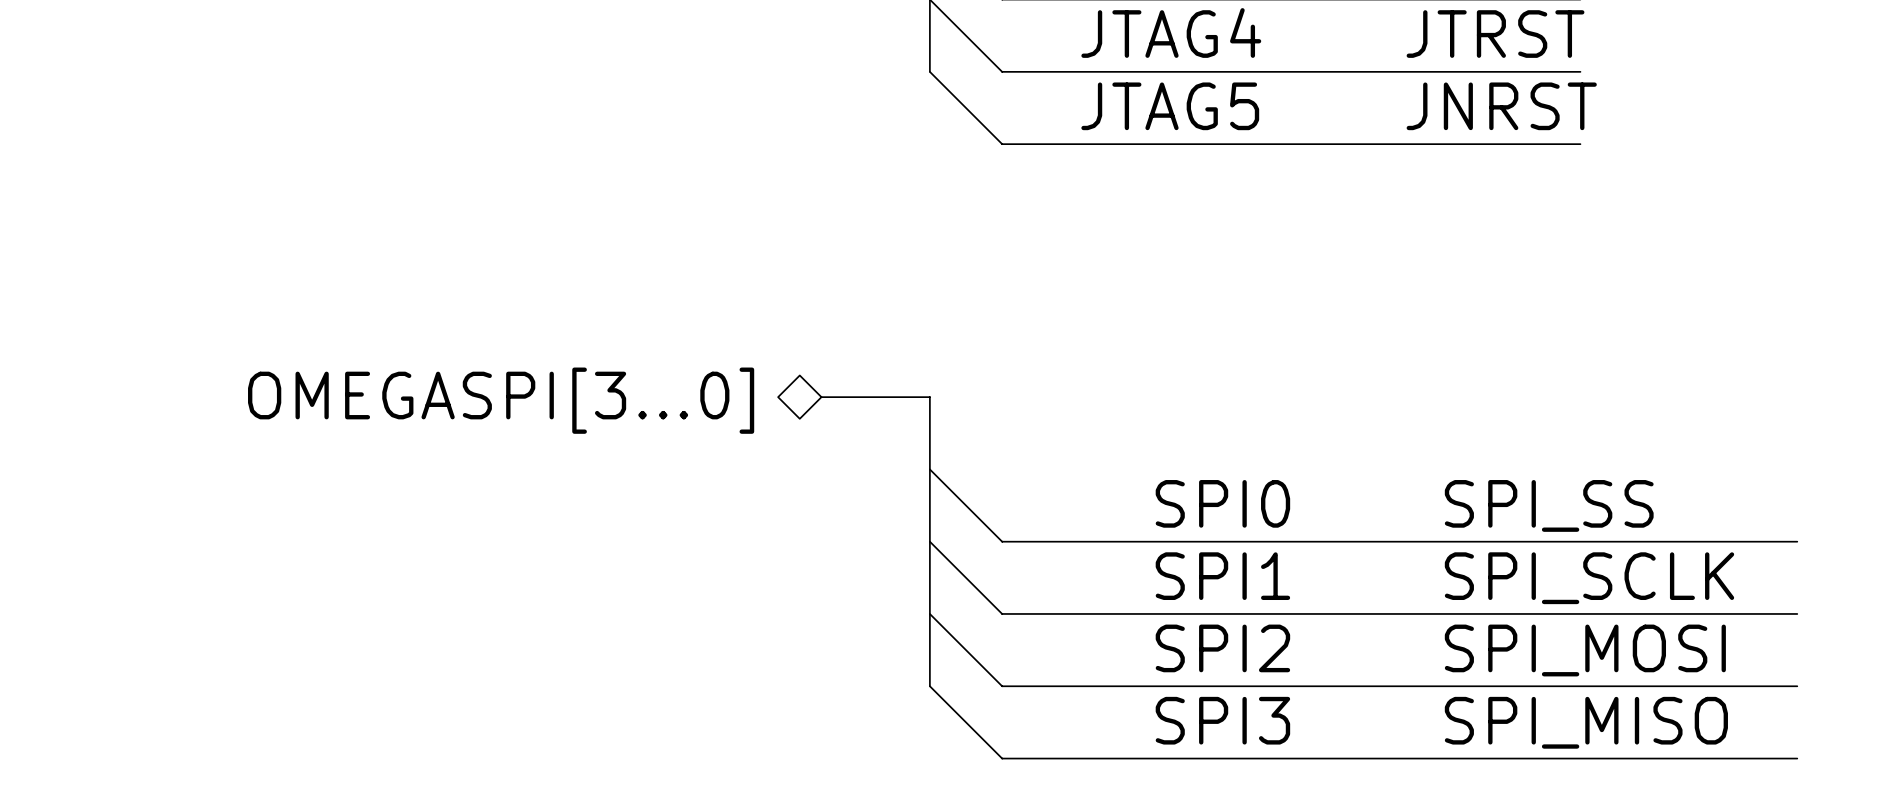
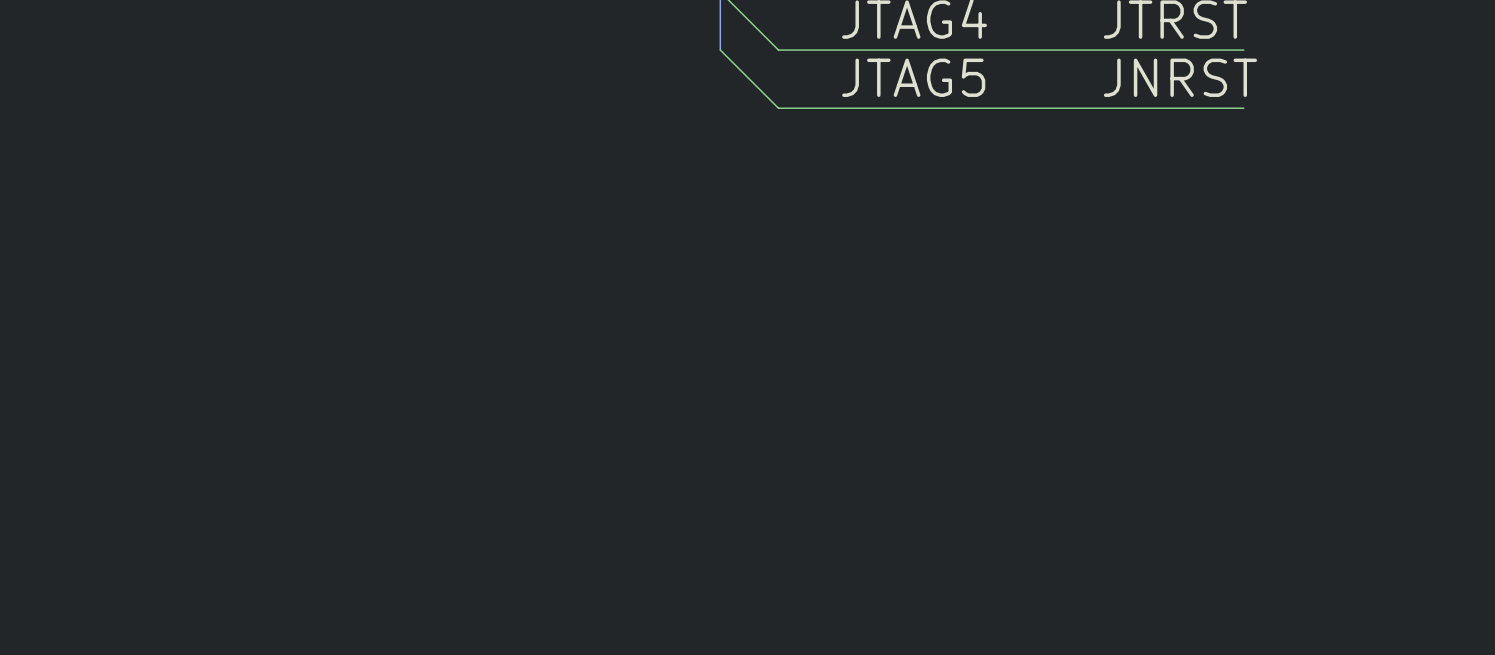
bus: (821, 397) (929, 397) (929, 686) -> none
hierarchical label: OMEGASPI[3...0] (501, 400) -> none
wire: (929, 469) (1002, 541) (1797, 541) -> none
label: SPI0 (1222, 503) -> none
label: SPI_SS (1549, 505) -> none
wire: (929, 541) (1002, 613) (1797, 613) -> none
label: SPI1 (1222, 576) -> none
label: SPI_SCLK (1589, 578) -> none
wire: (929, 613) (1002, 686) (1797, 686) -> none
label: SPI2 (1222, 648) -> none
label: SPI_MOSI (1585, 650) -> none
wire: (929, 686) (1002, 758) (1797, 758) -> none
label: SPI3 (1222, 720) -> none
label: SPI_MISO (1586, 722) -> none

